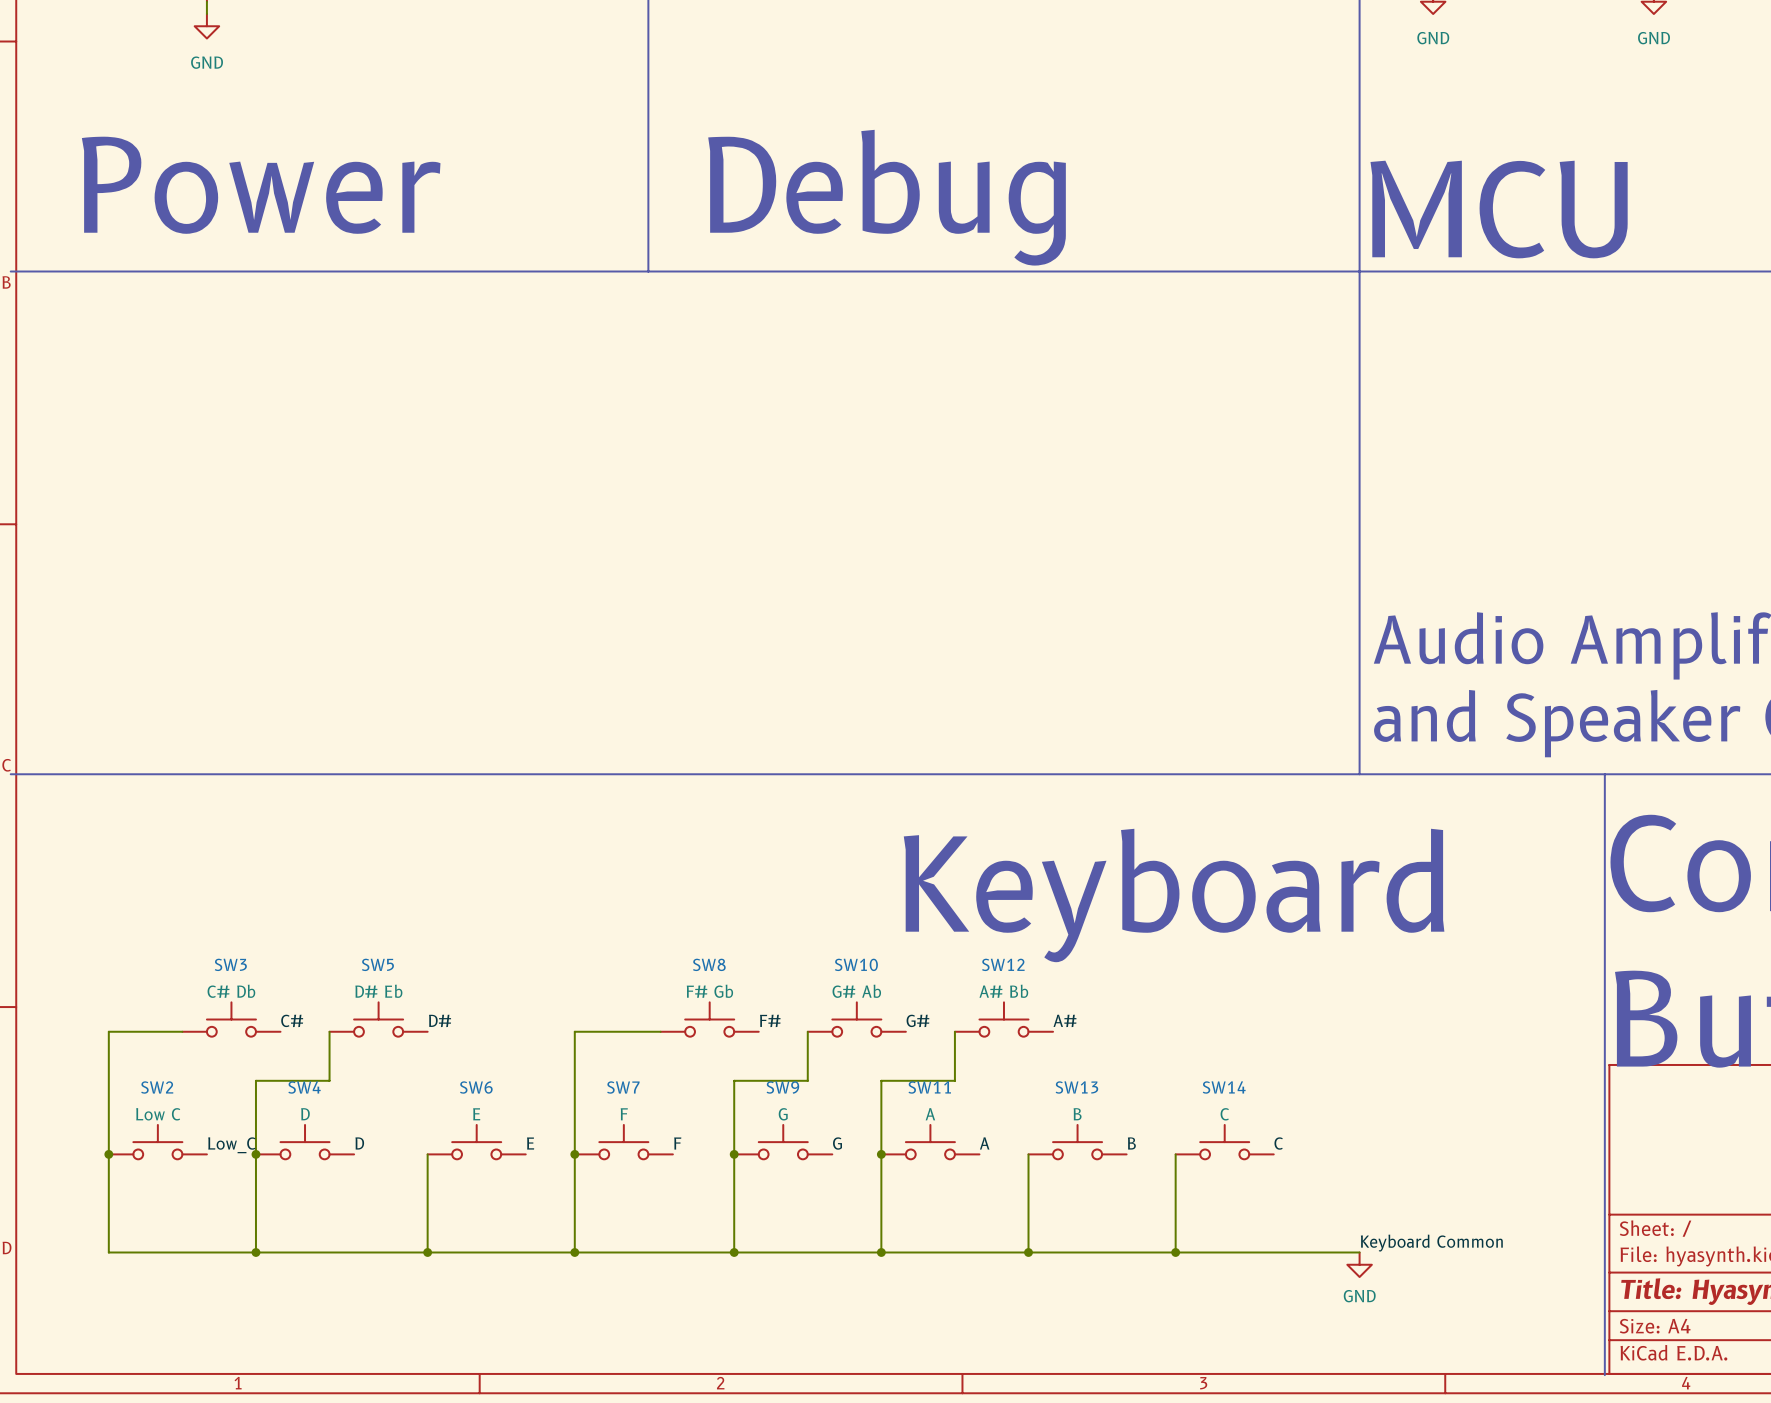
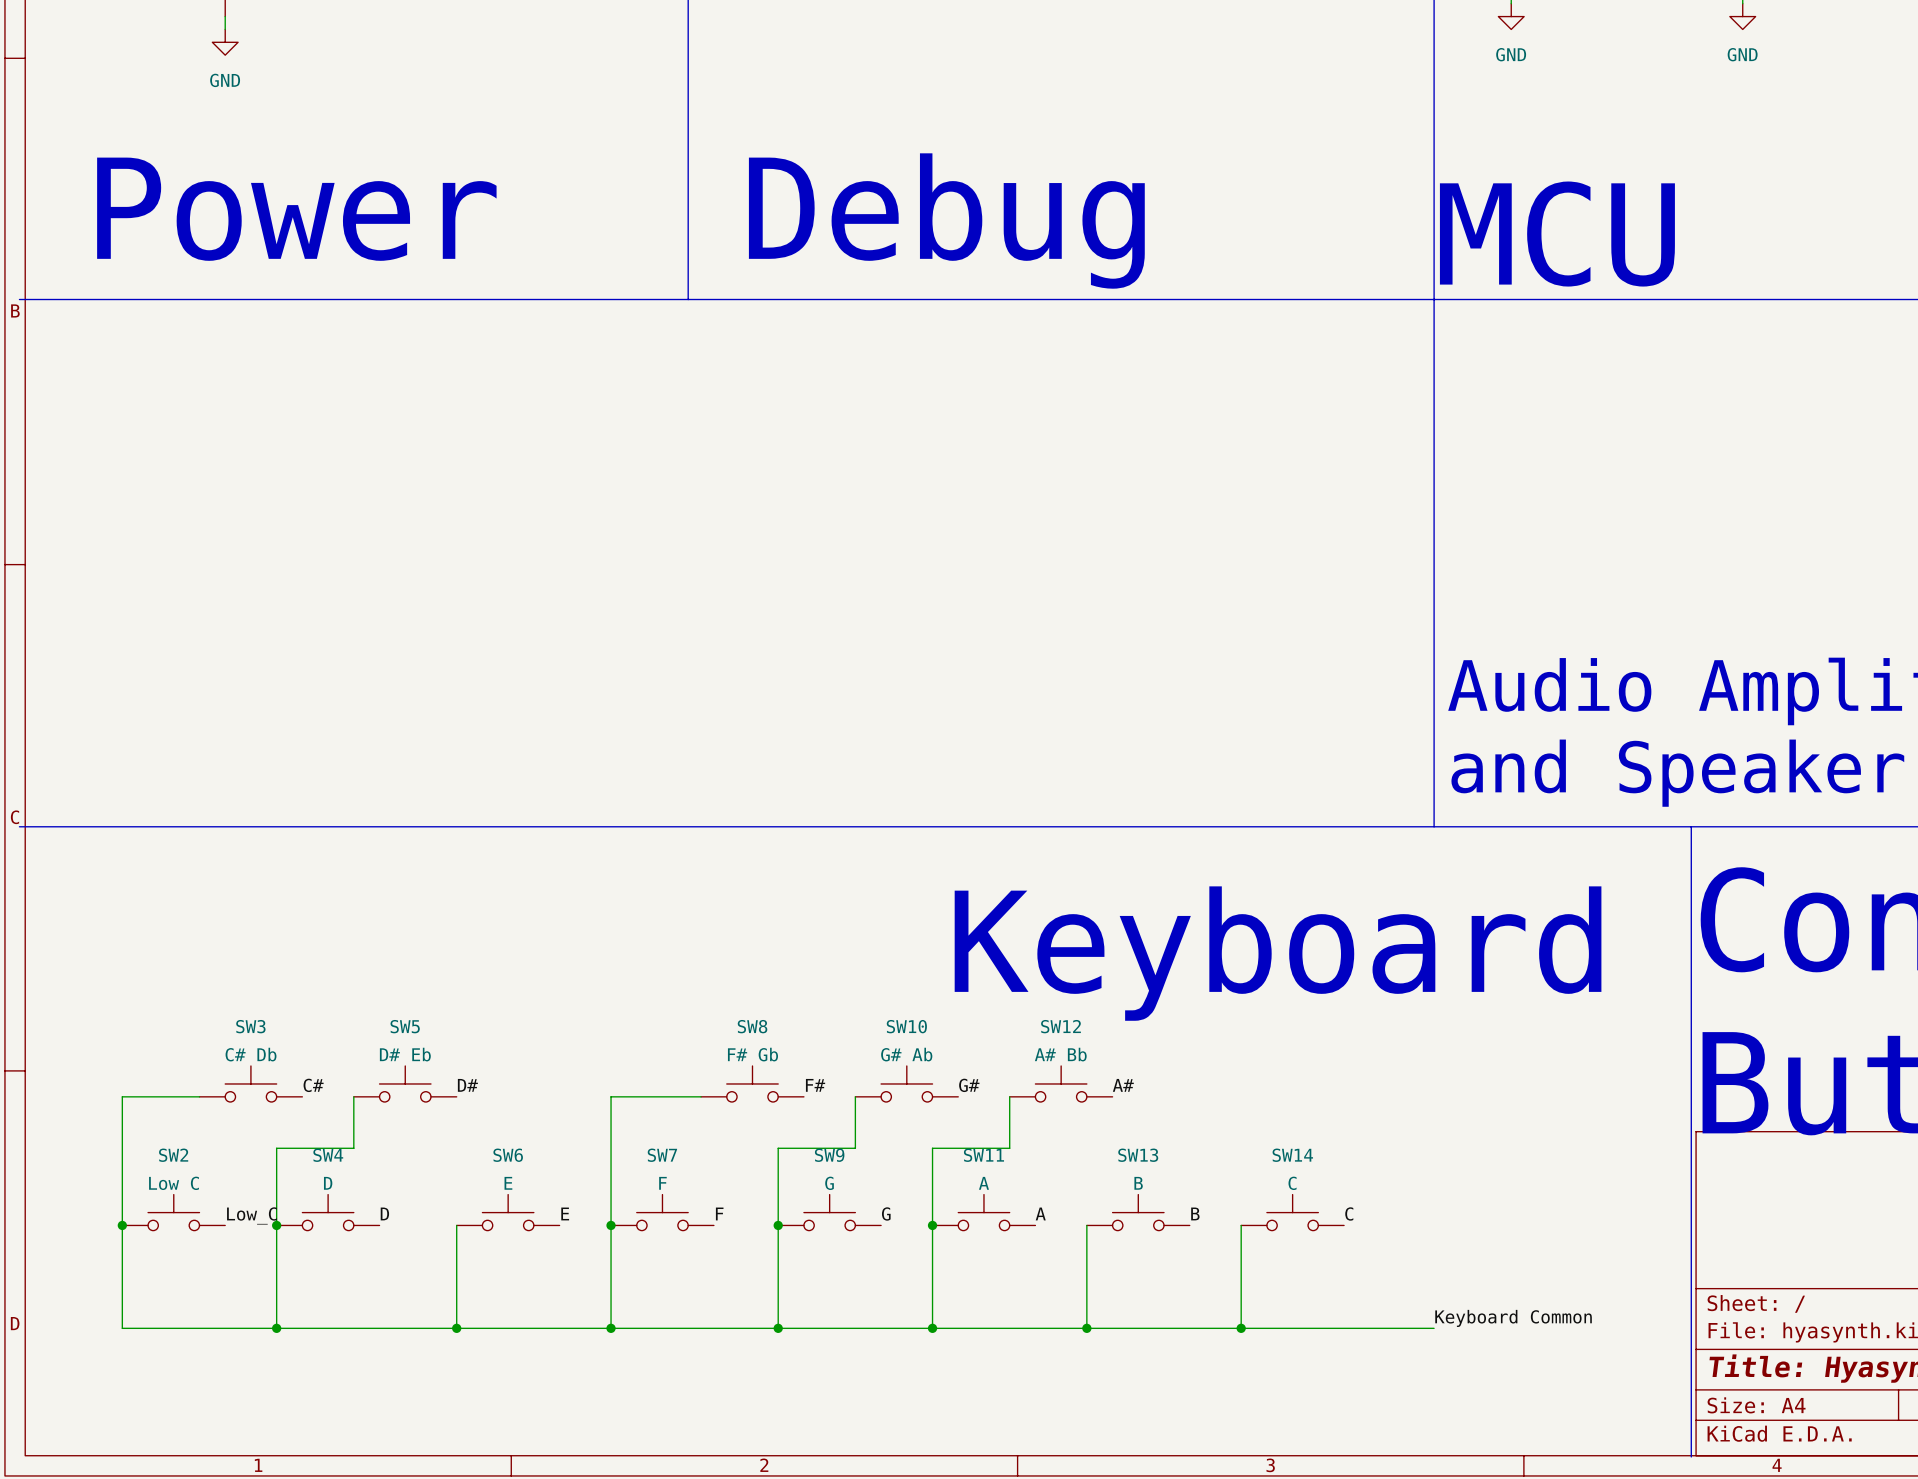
power symbol: GND (1359, 1264) -> none

